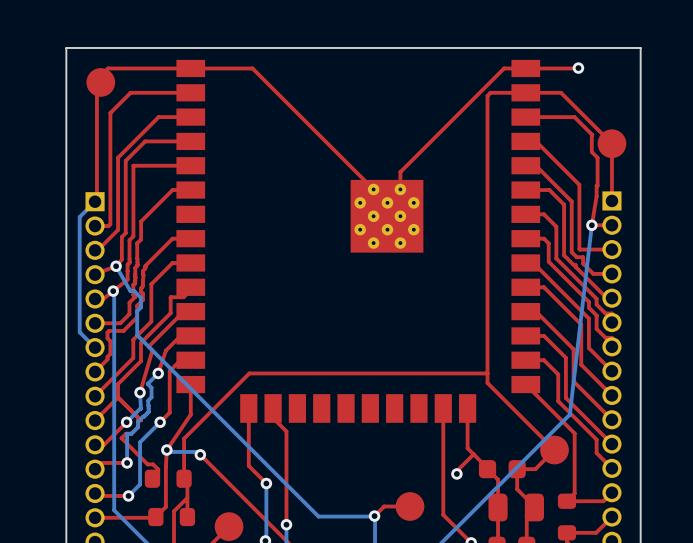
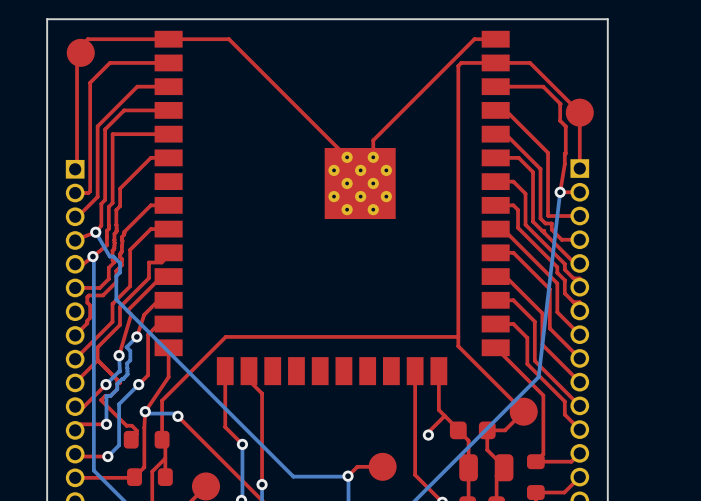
top track: (578, 68) (525, 68) -> none
via: (578, 68) -> none
bottom track: (95, 201) (79, 217) (79, 332) (95, 347) -> none

